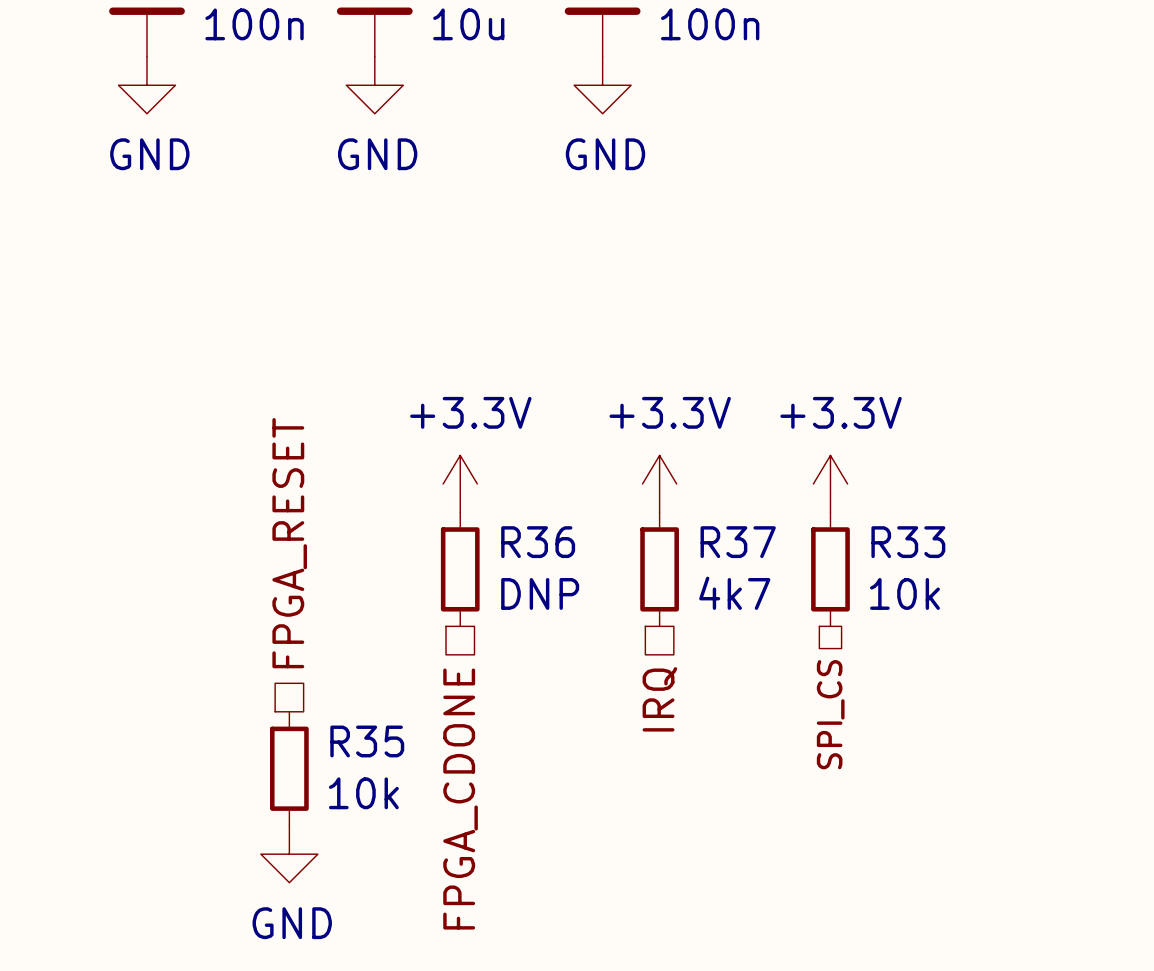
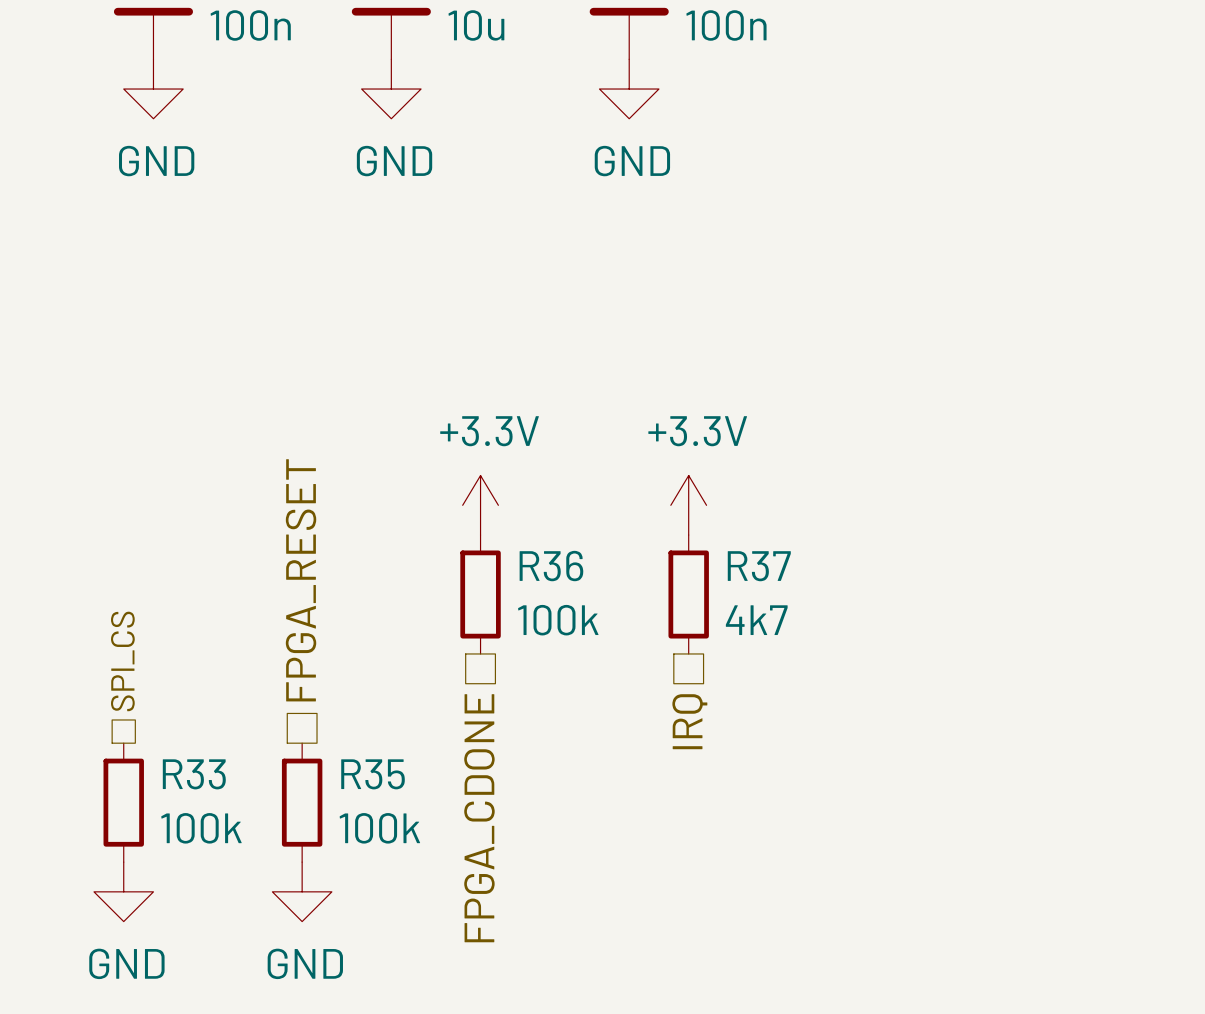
power symbol: +3.3V (830, 483) -> none
R33 position: (830, 569) -> (123, 802)
R36 value: DNP (540, 593) -> 100k (558, 620)
R33 value: 10k (904, 593) -> 100k (201, 828)
hierarchical label: none -> SPI_CS (122, 661)
hierarchical label: SPI_CS (830, 714) -> none
R35 value: 10k (363, 793) -> 100k (379, 828)
power symbol: none -> GND (123, 891)

